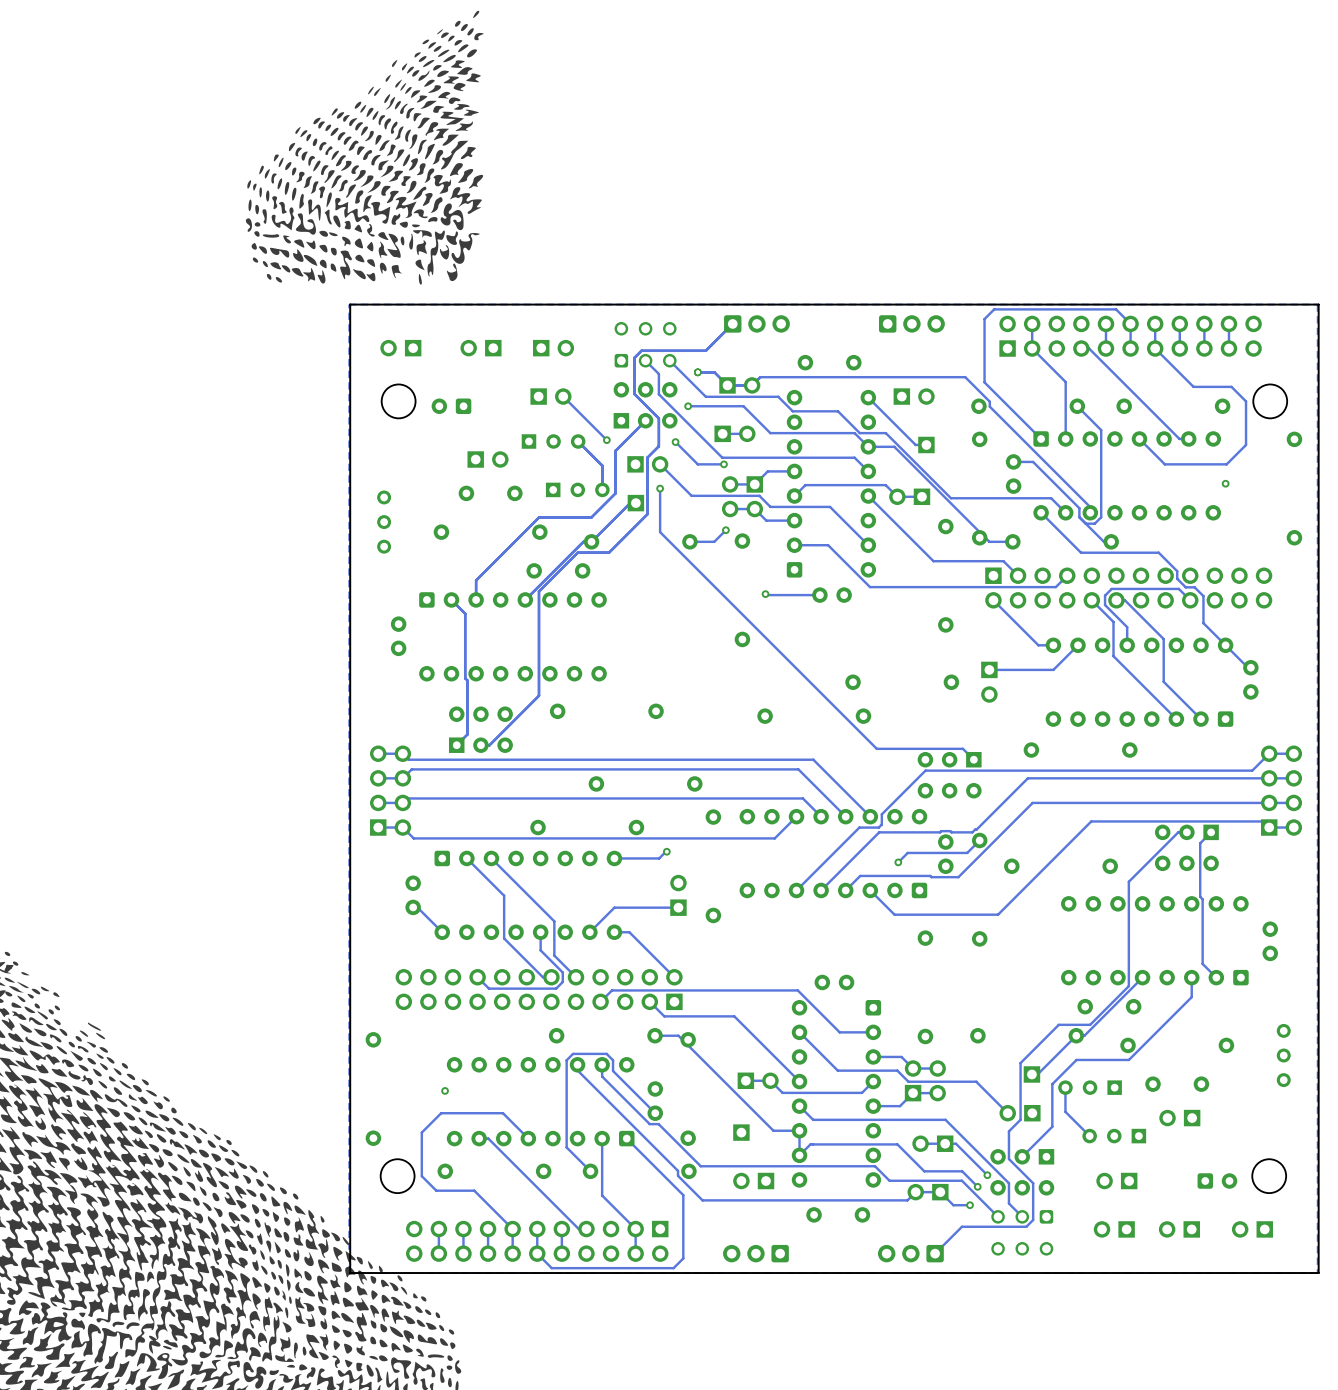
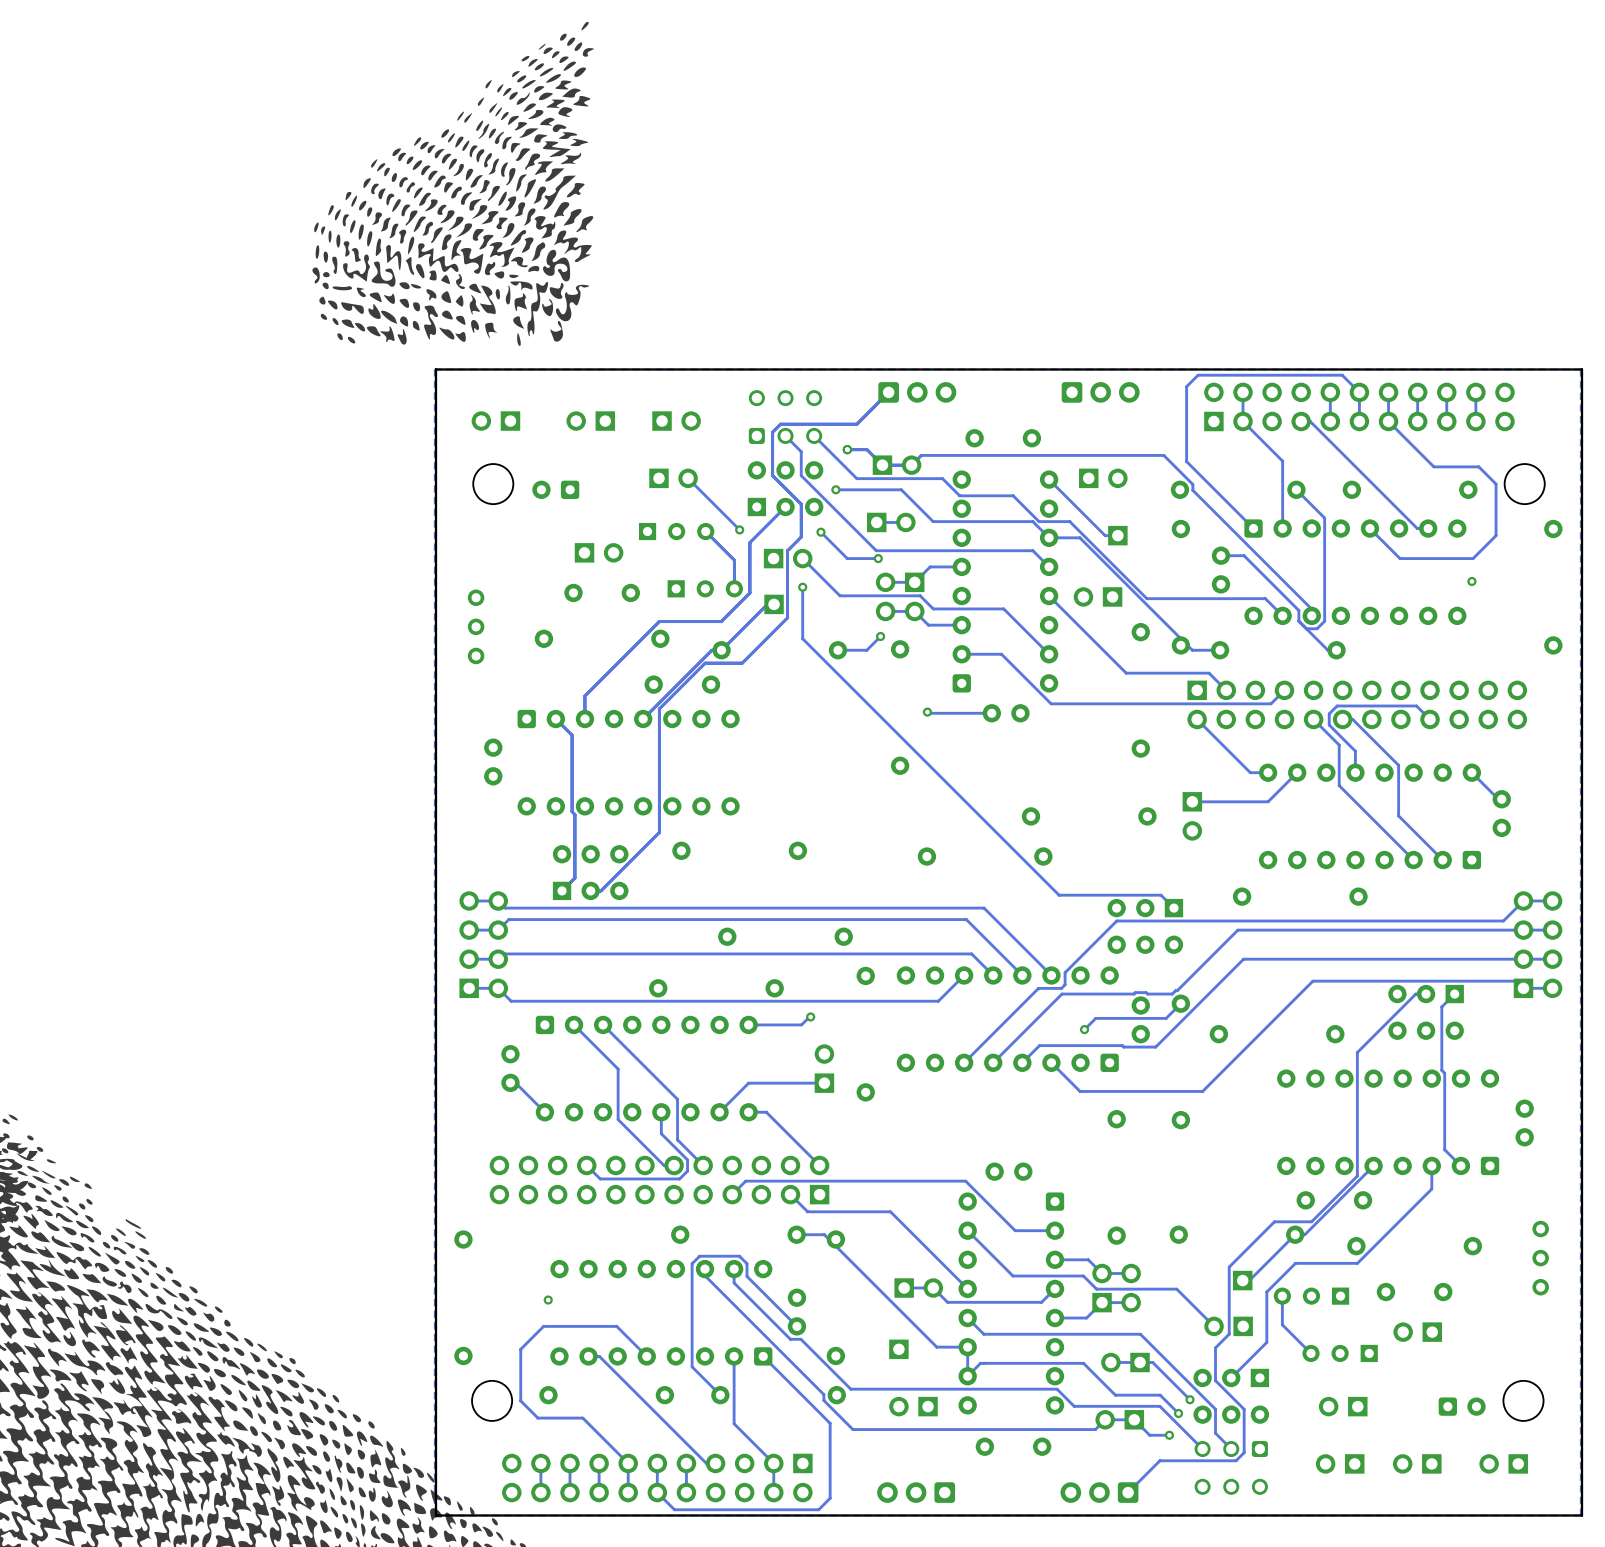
track: (794, 496) (805, 485) (885, 485) (897, 496) (921, 496) -> none
track: (1041, 512) (1081, 552) (1158, 552) (1177, 571) (1177, 578) (1185, 587) (1194, 587) (1203, 596) (1203, 623) (1225, 645) -> none

